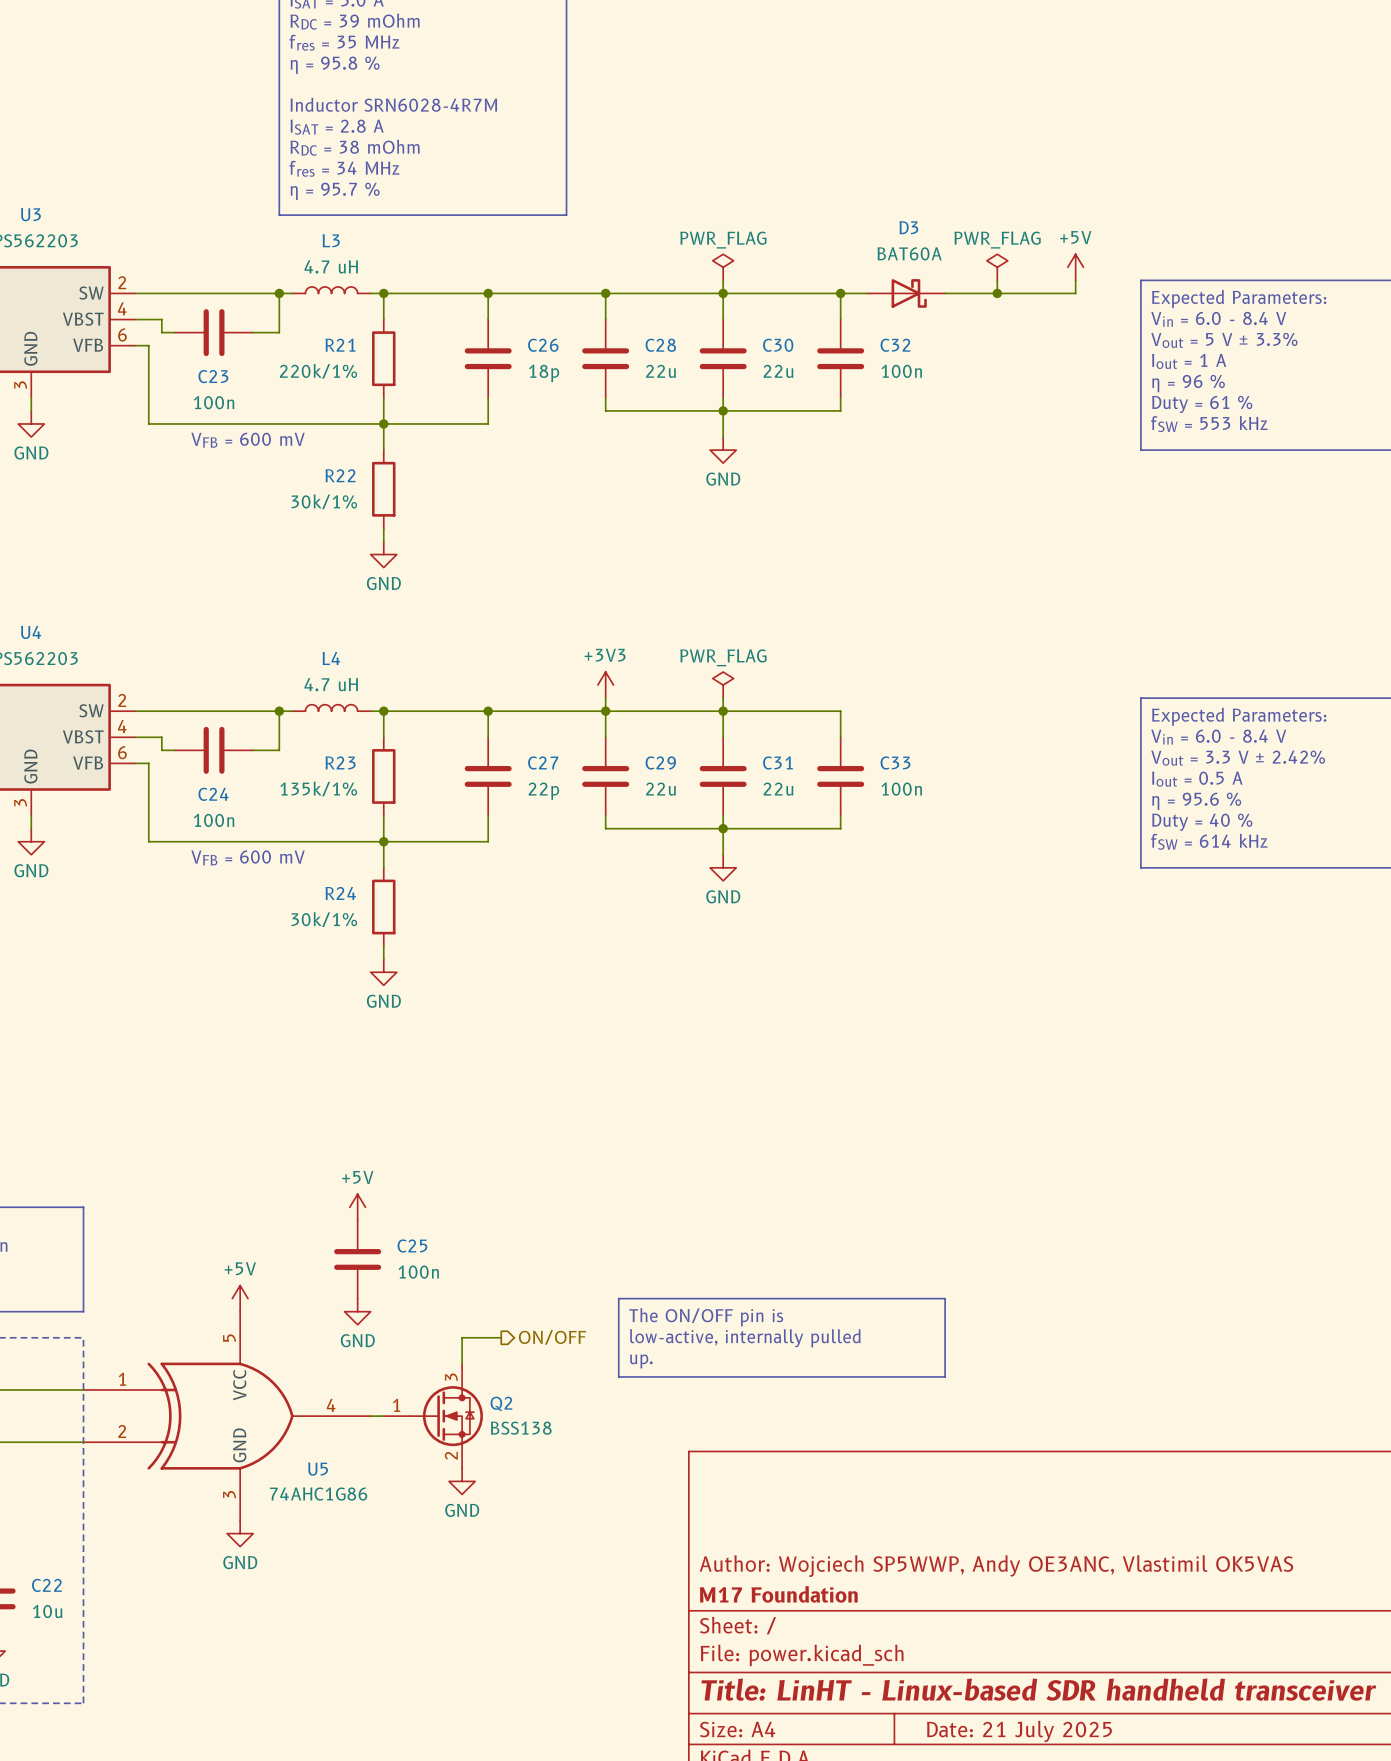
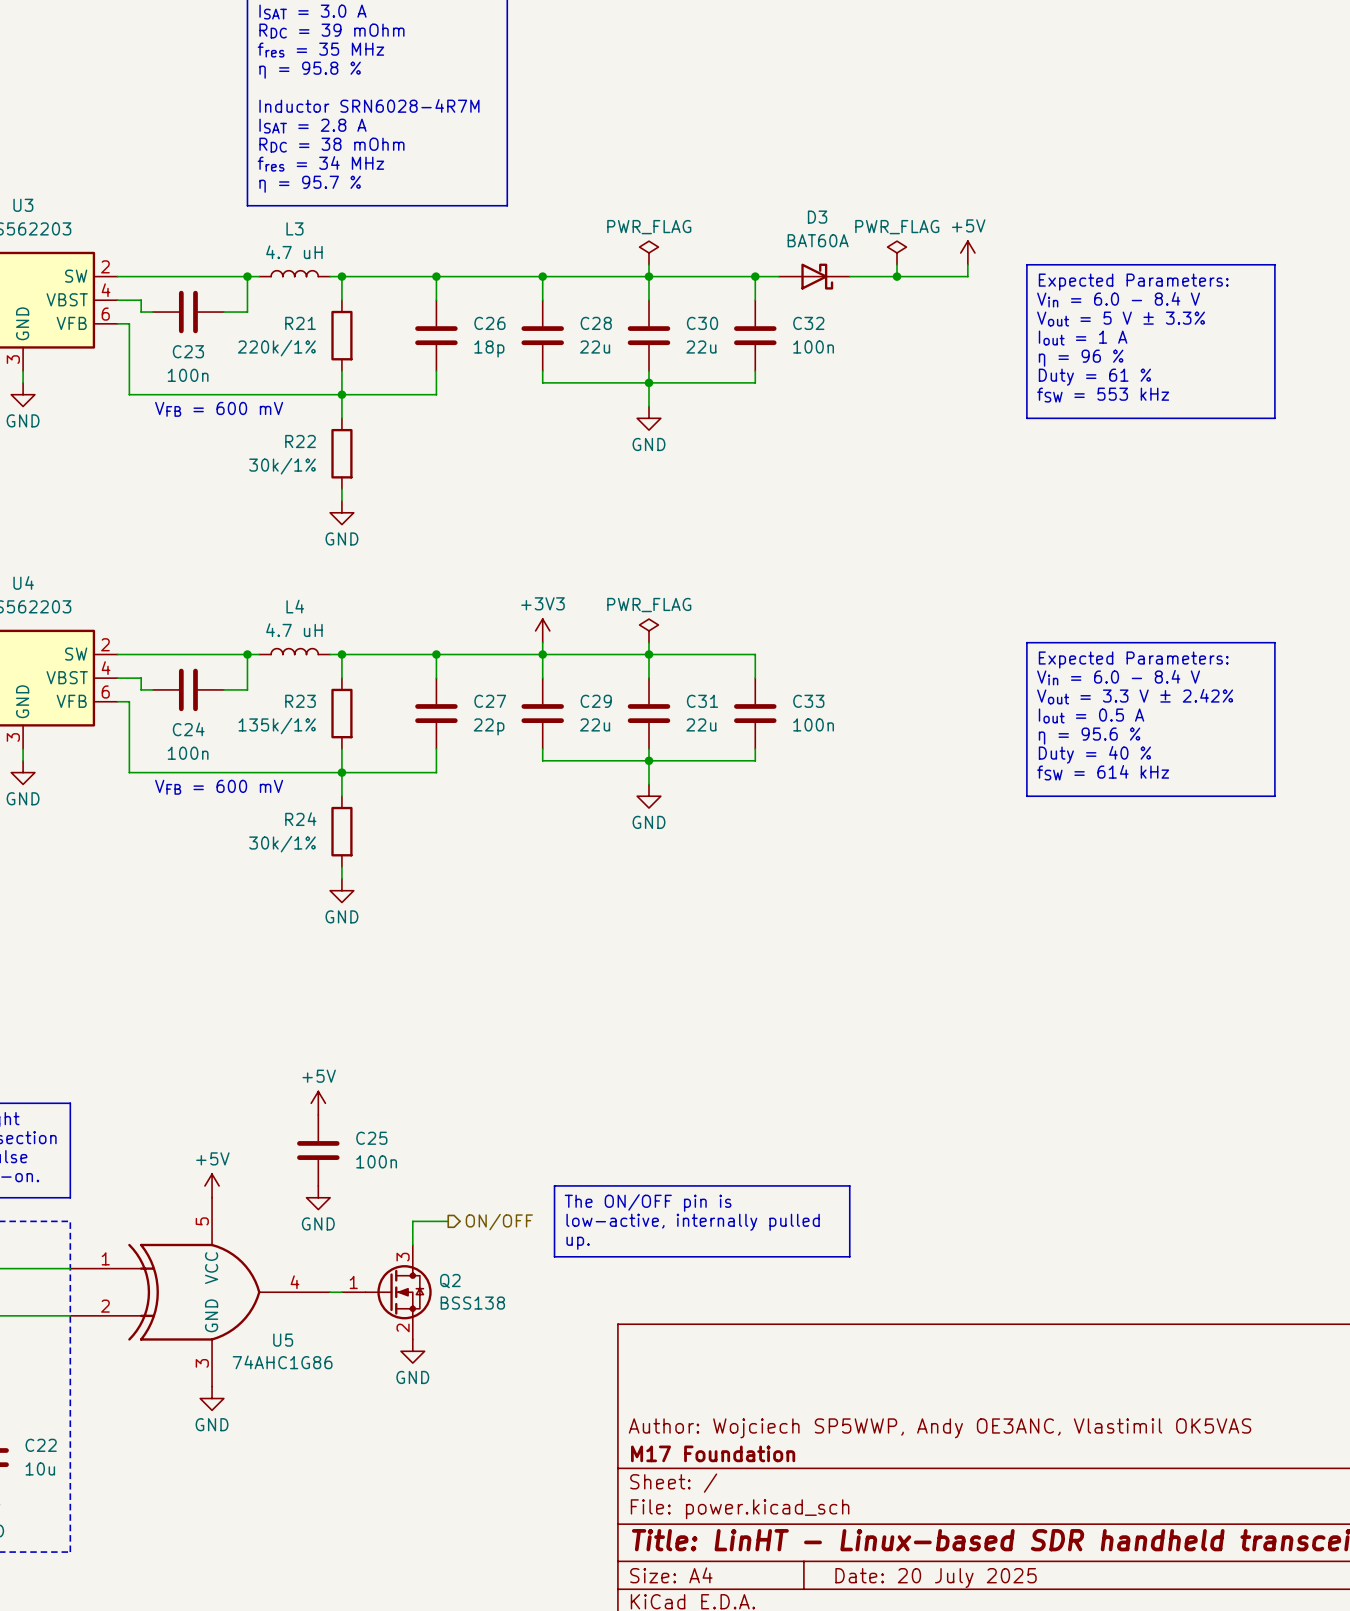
title block: Date: 21 July 2025 (1019, 1731) -> Date: 20 July 2025 (936, 1578)

